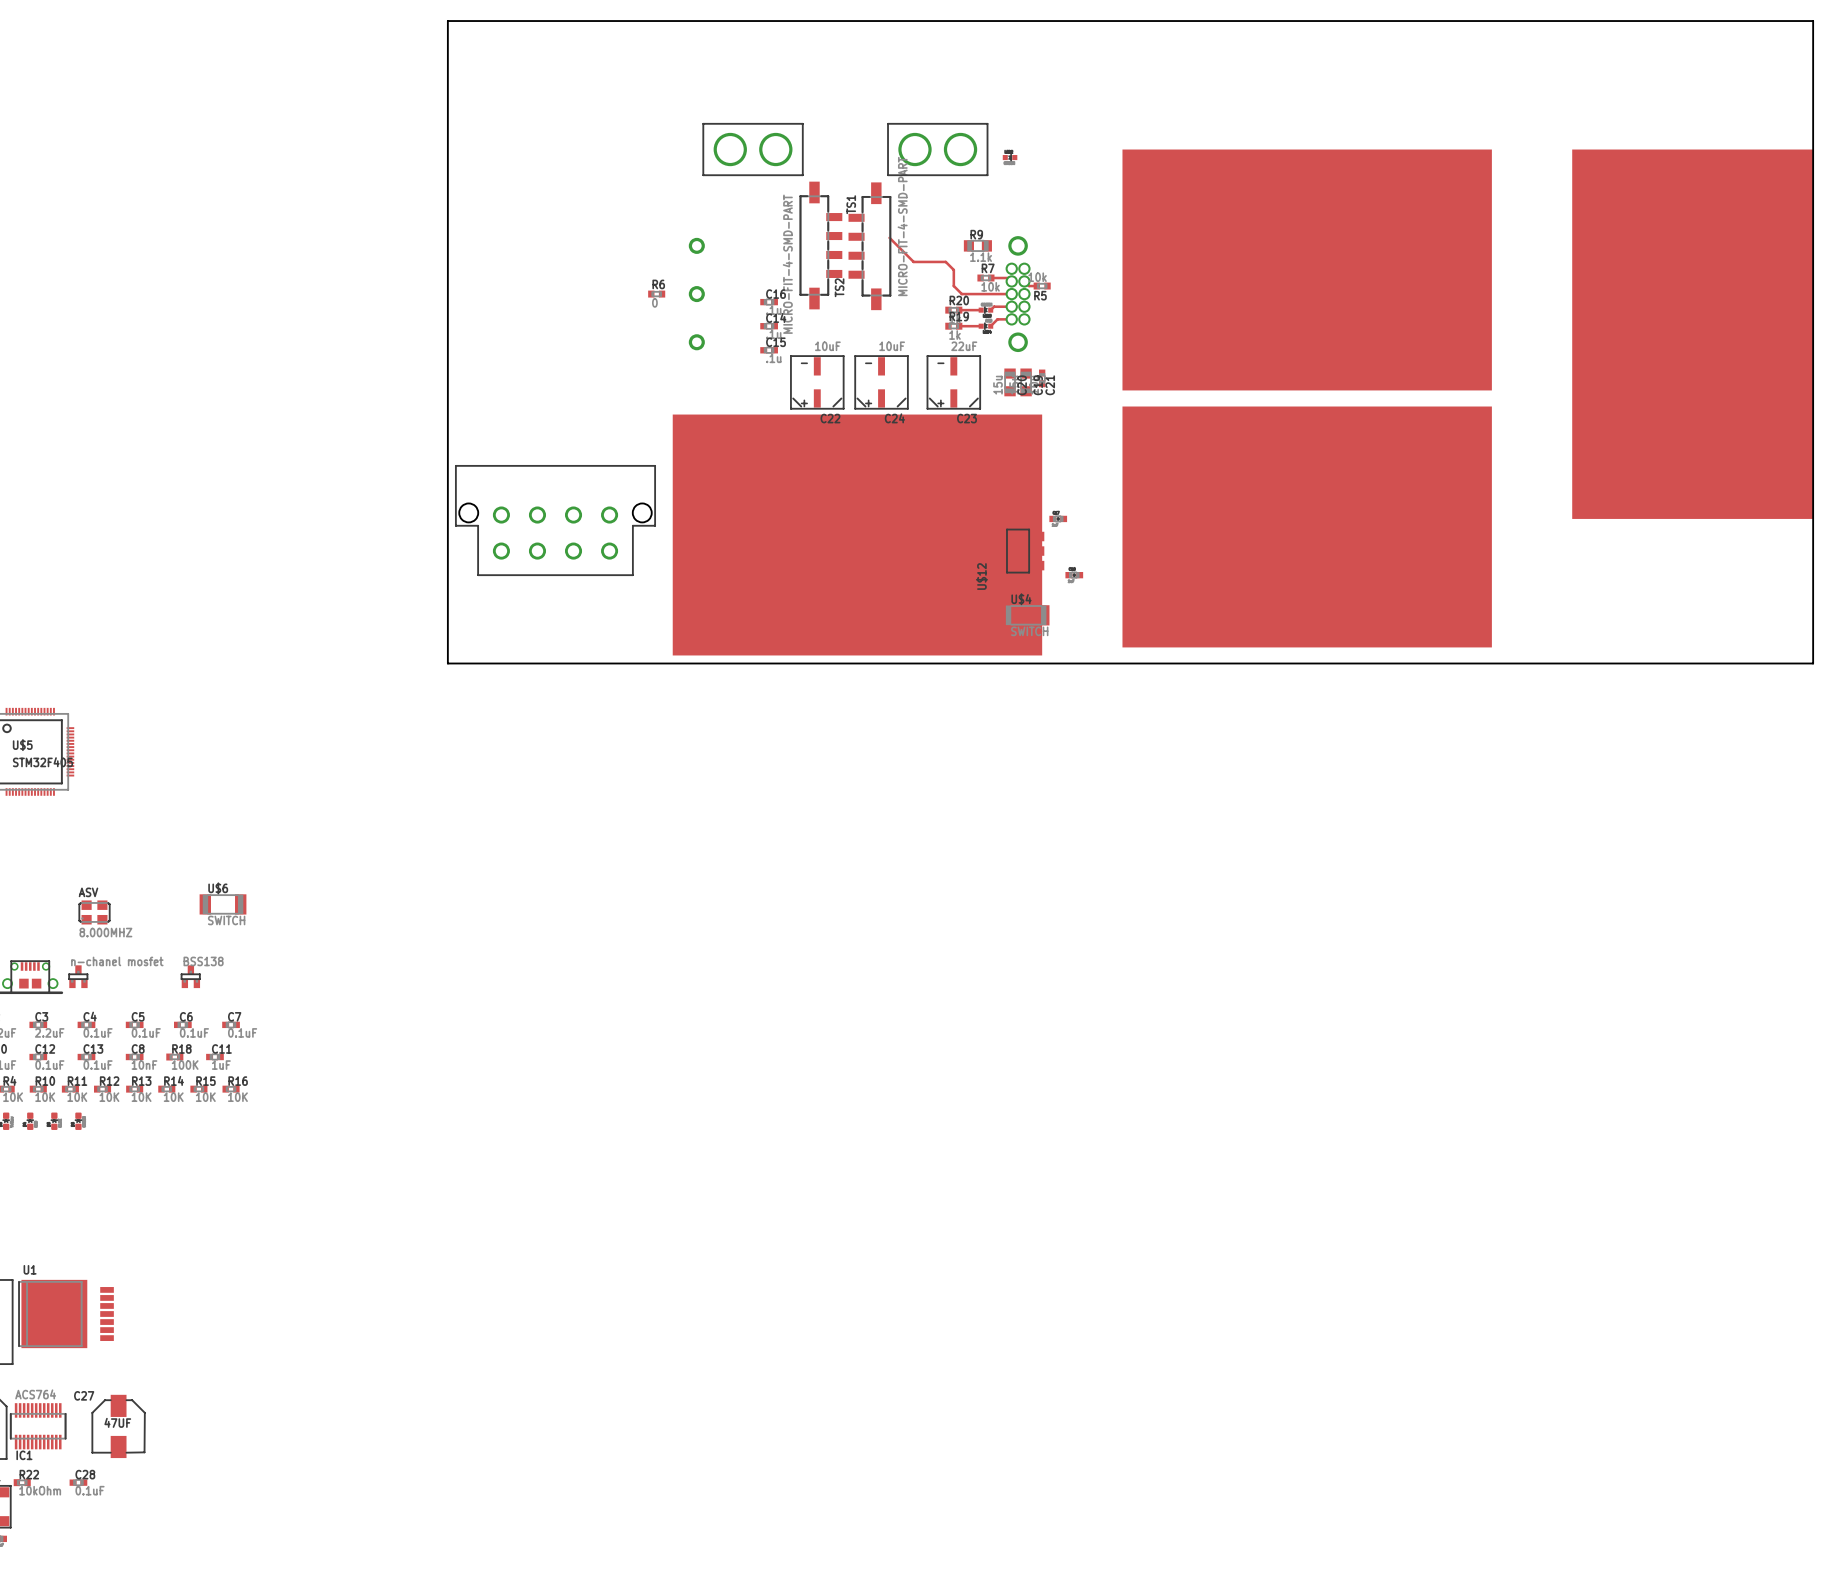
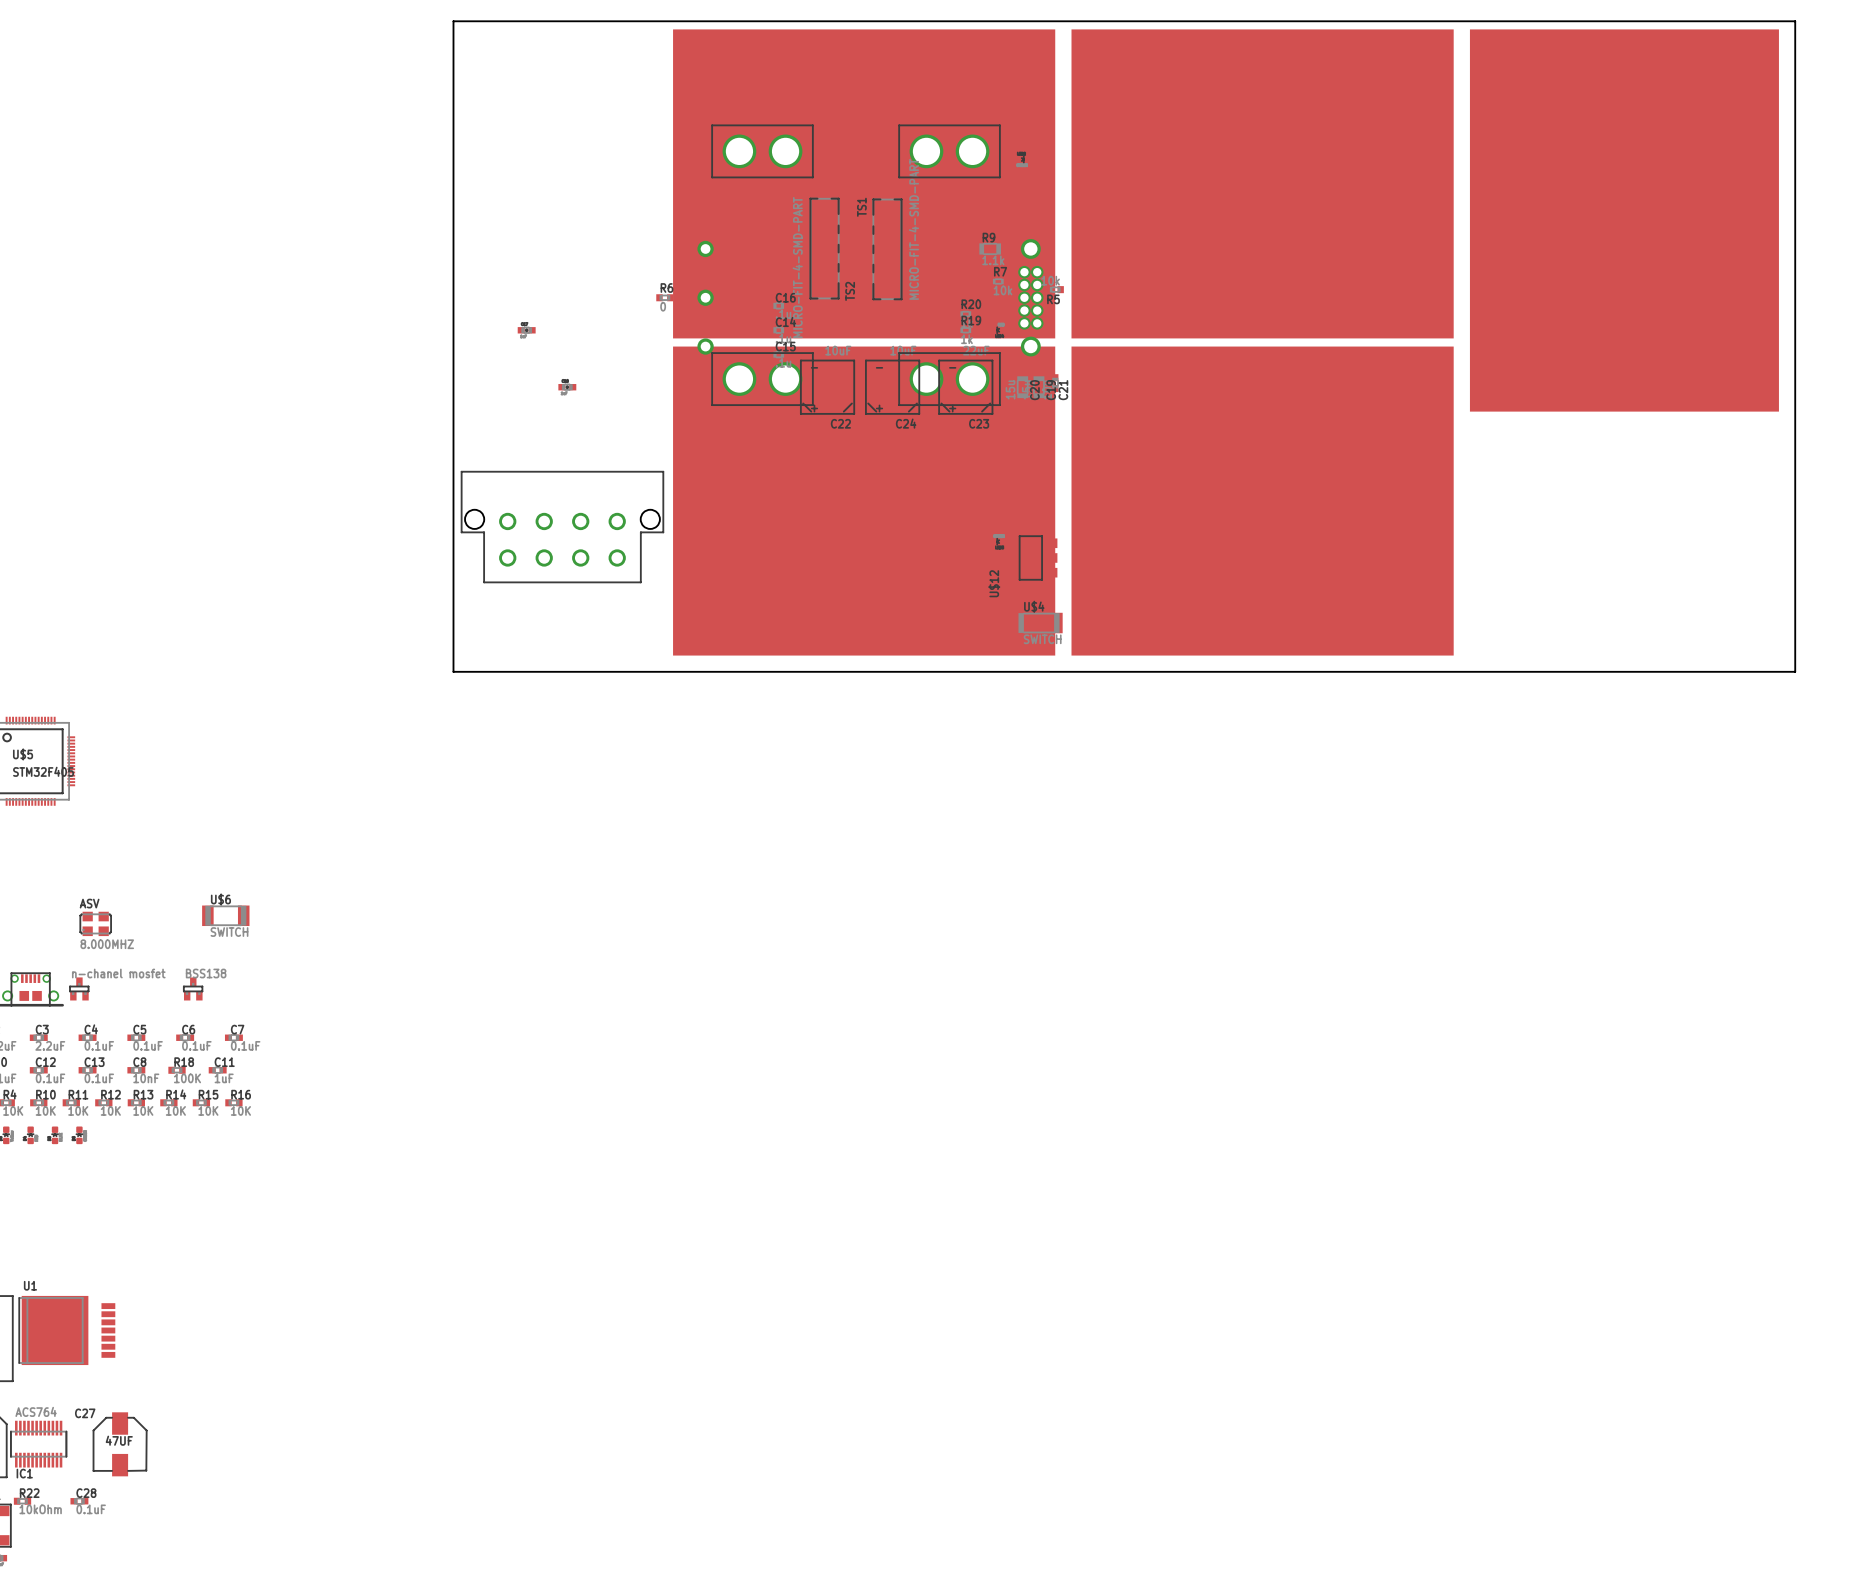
board edge: (1772, 21) (1813, 21) (1813, 663) (1772, 663) -> (1795, 21) (1795, 671)
drawing: none -> [673, 29, 1056, 339]
drawing: none -> [1071, 29, 1454, 339]
drawing: none -> [1469, 29, 1779, 412]
drawing: [1122, 149, 1492, 391] -> none
drawing: [1572, 149, 1814, 519] -> none
track: (889, 237) (913, 261) (945, 261) (953, 269) (953, 286) (961, 294) (1011, 294) -> none
track: (991, 278) (1008, 278) (1011, 281) -> none
track: (1011, 306) (994, 306) (990, 310) -> none
track: (959, 310) (981, 310) -> none
part position: (985, 310) -> (998, 541)
track: (1011, 319) (997, 319) (990, 326) -> none
track: (959, 326) (981, 326) -> none
drawing: none -> [673, 346, 1056, 656]
drawing: none -> [1071, 346, 1454, 656]
part: none -> (762, 379)
part: none -> (949, 379)
drawing: [1122, 406, 1492, 648] -> none
drawing: [672, 414, 1043, 656] -> none
part position: (1058, 518) -> (526, 330)
part position: (1074, 575) -> (567, 387)

